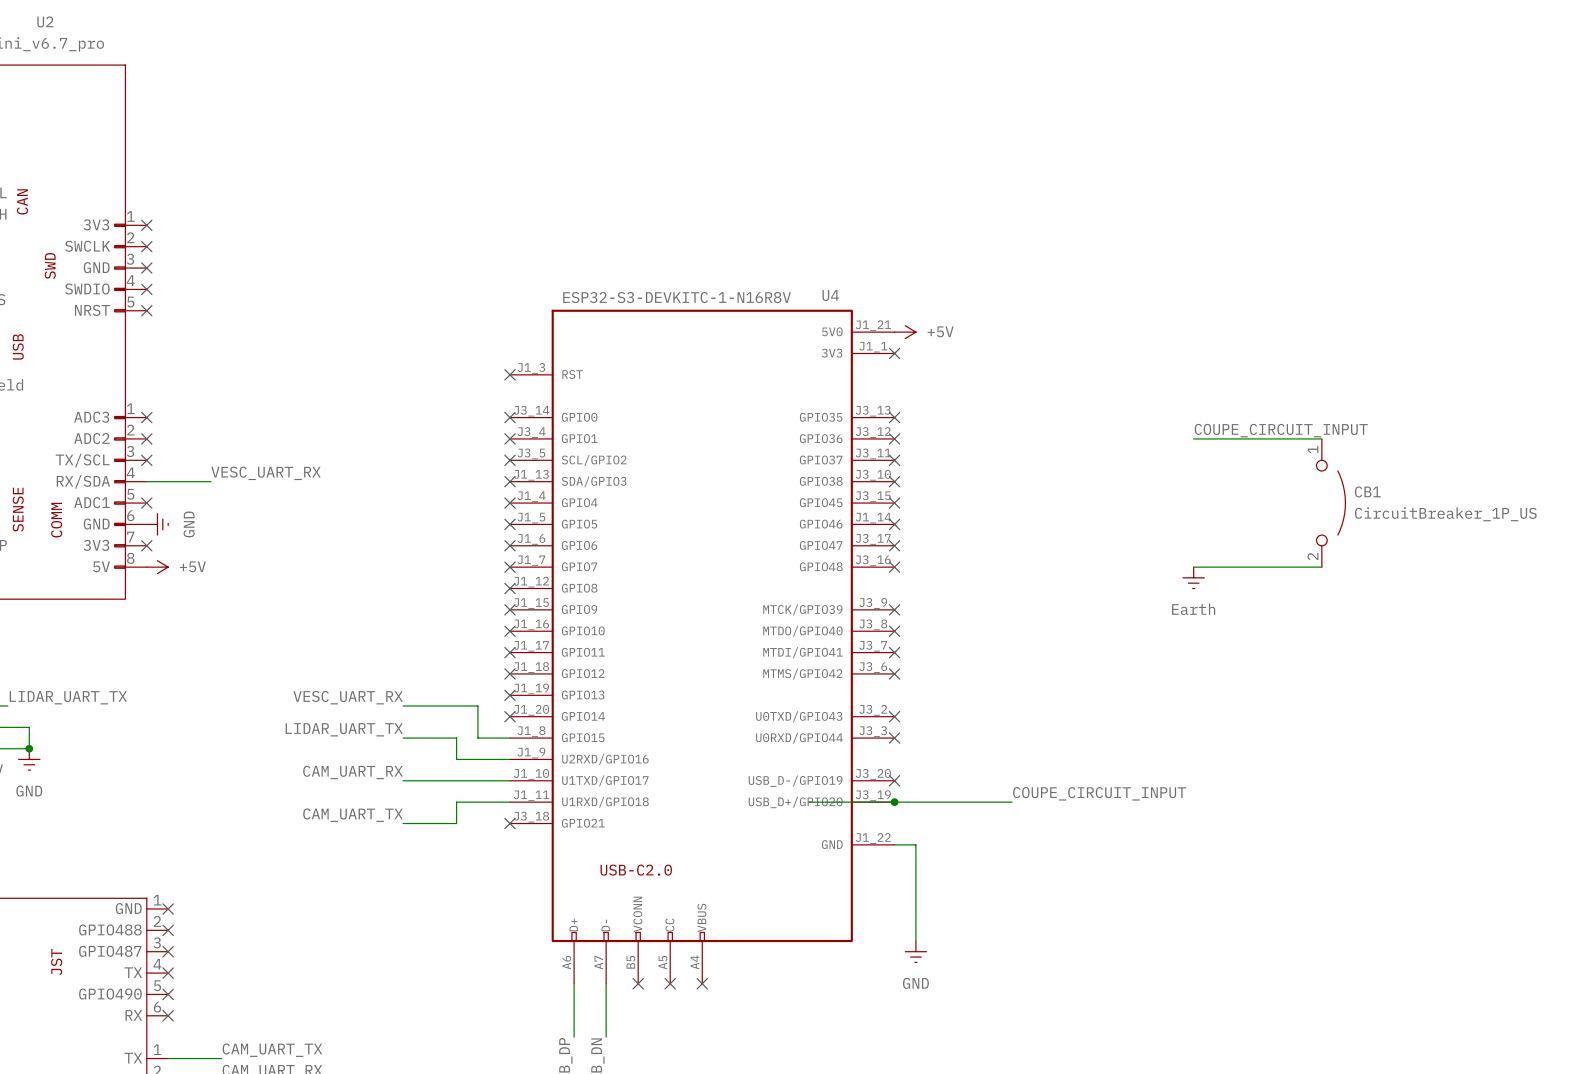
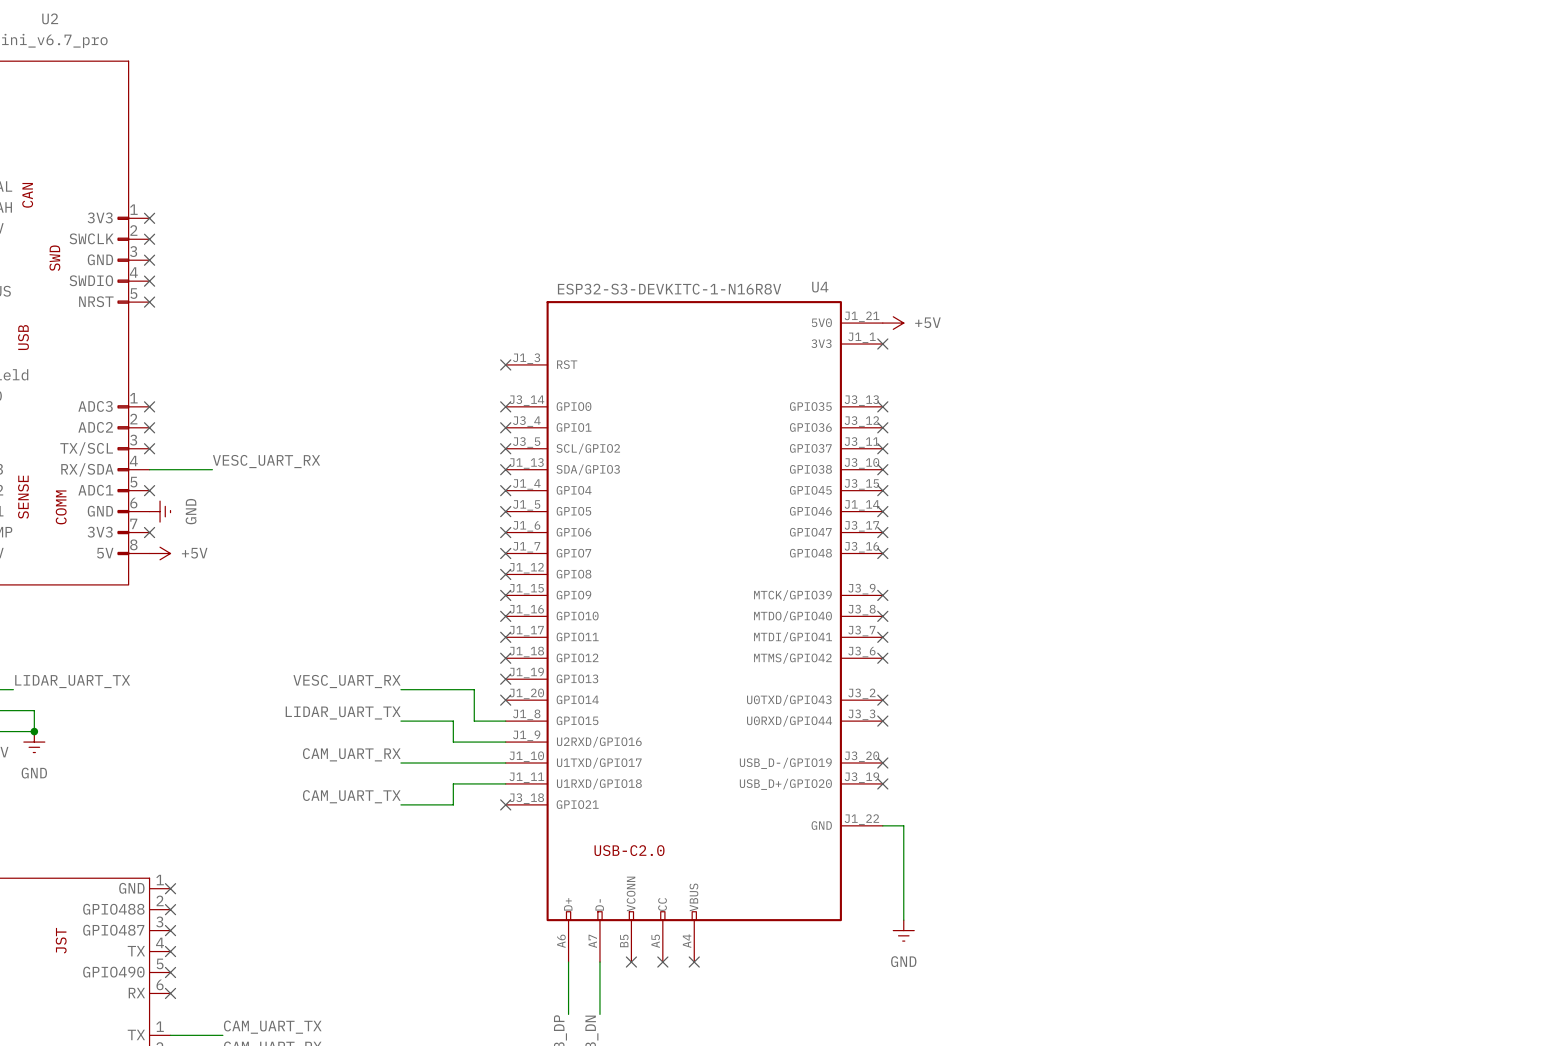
label: COUPE_CIRCUIT_INPUT (1281, 430) -> none
wire: (1193, 438) (1321, 438) -> none
CB1: CircuitBreaker_1P_US (1330, 503) -> none
wire: (1193, 567) (1321, 567) -> none
power symbol: Earth (1193, 577) -> none
label: COUPE_CIRCUIT_INPUT (1099, 793) -> none
wire: (809, 802) (1012, 802) -> none
junction: (894, 802) -> none
no-connect mark: none -> (882, 783)

